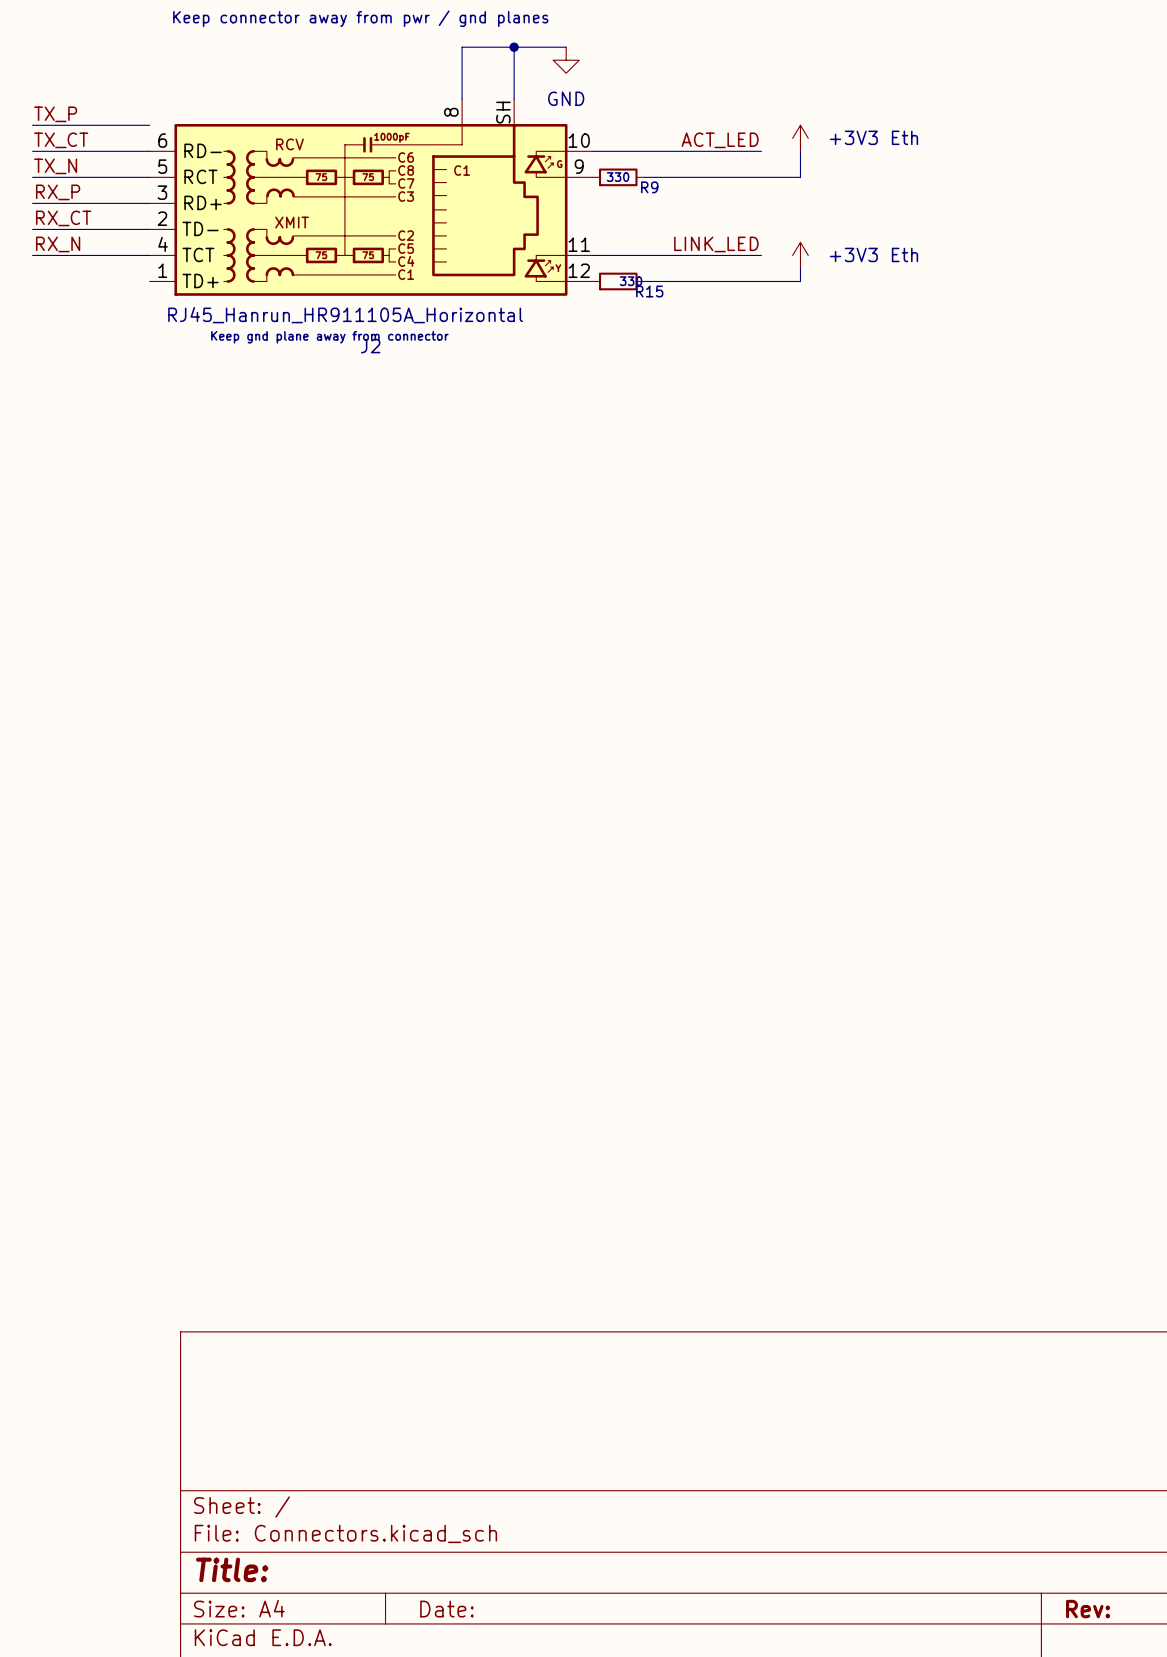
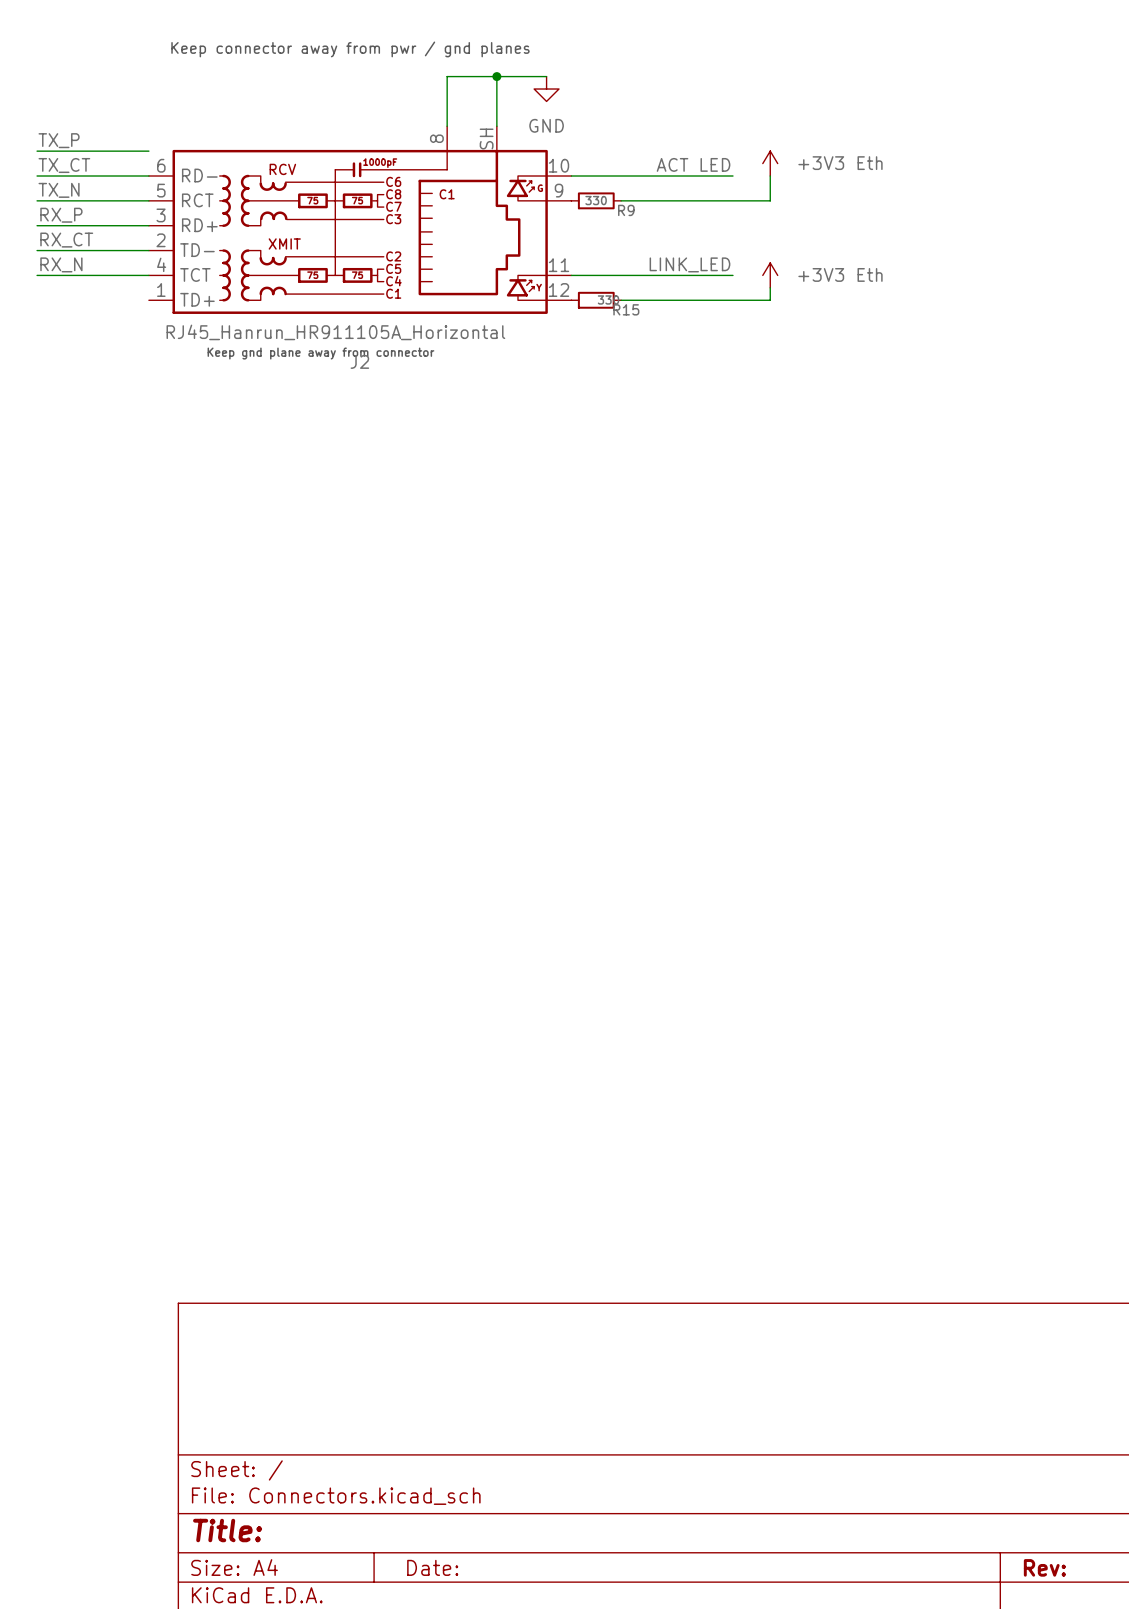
label: ACT_LED (720, 140) -> ACT LED (693, 164)

